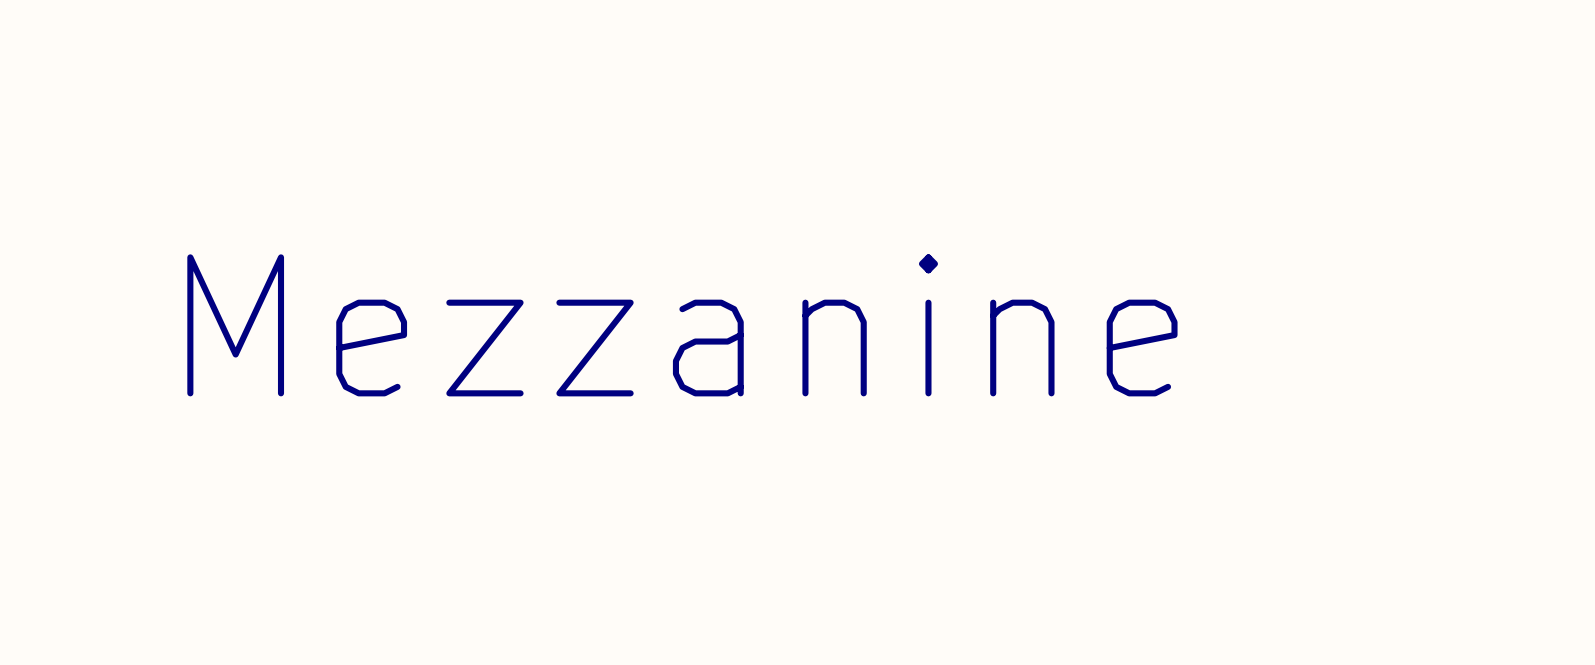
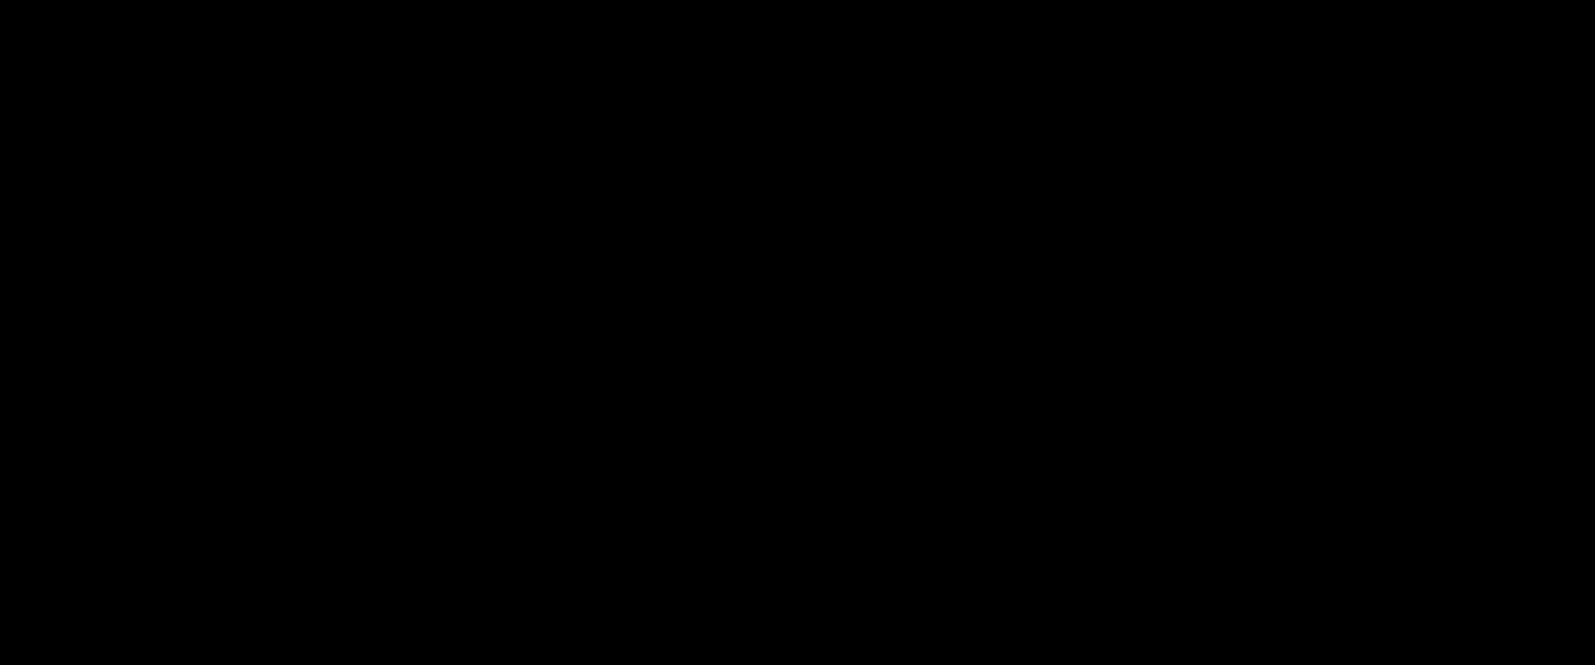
text: Mezzanine (682, 325) -> none

